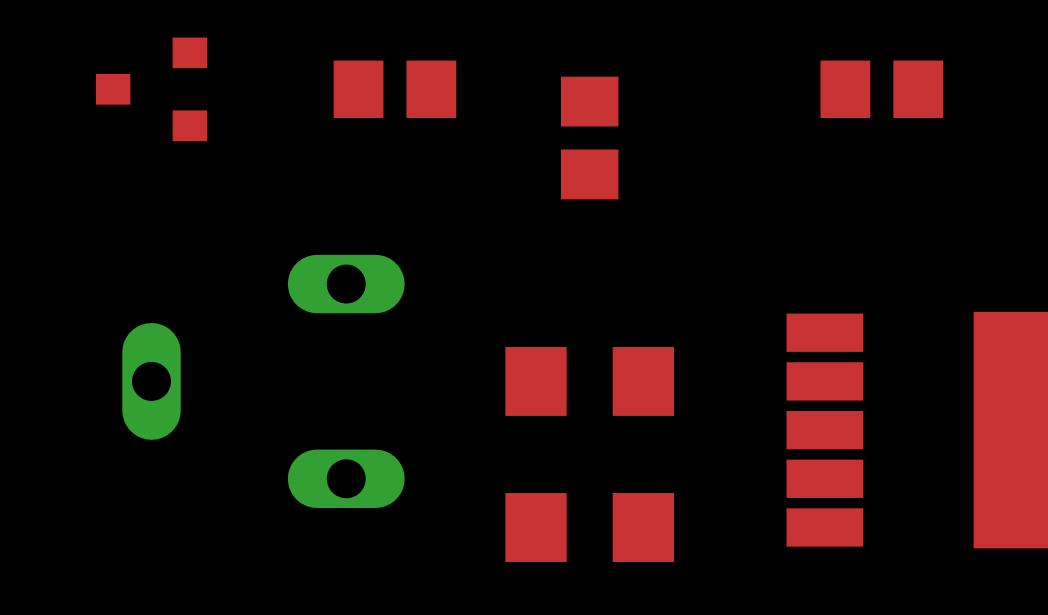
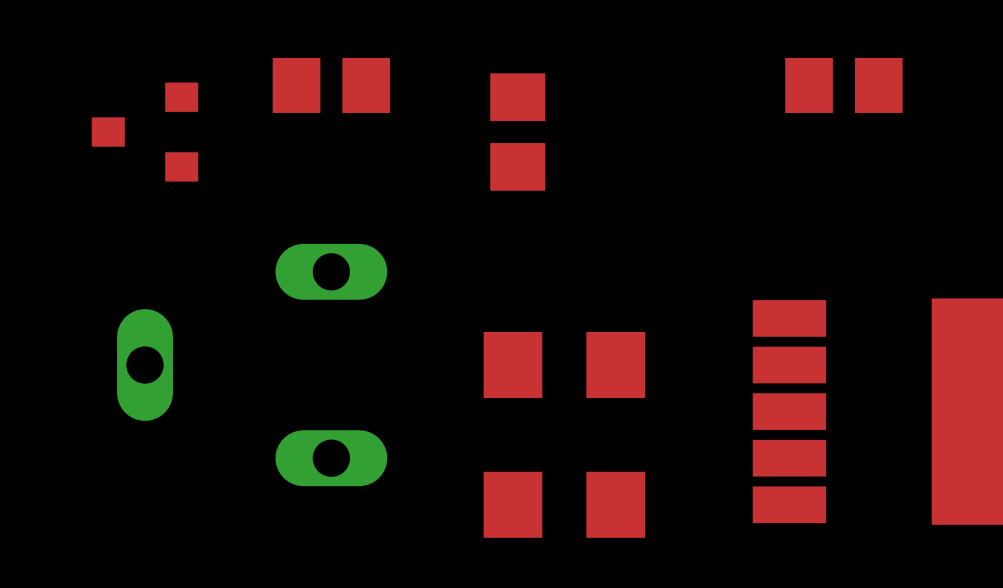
part position: (151, 89) -> (145, 132)
part position: (394, 89) -> (331, 85)
part position: (589, 137) -> (517, 132)

